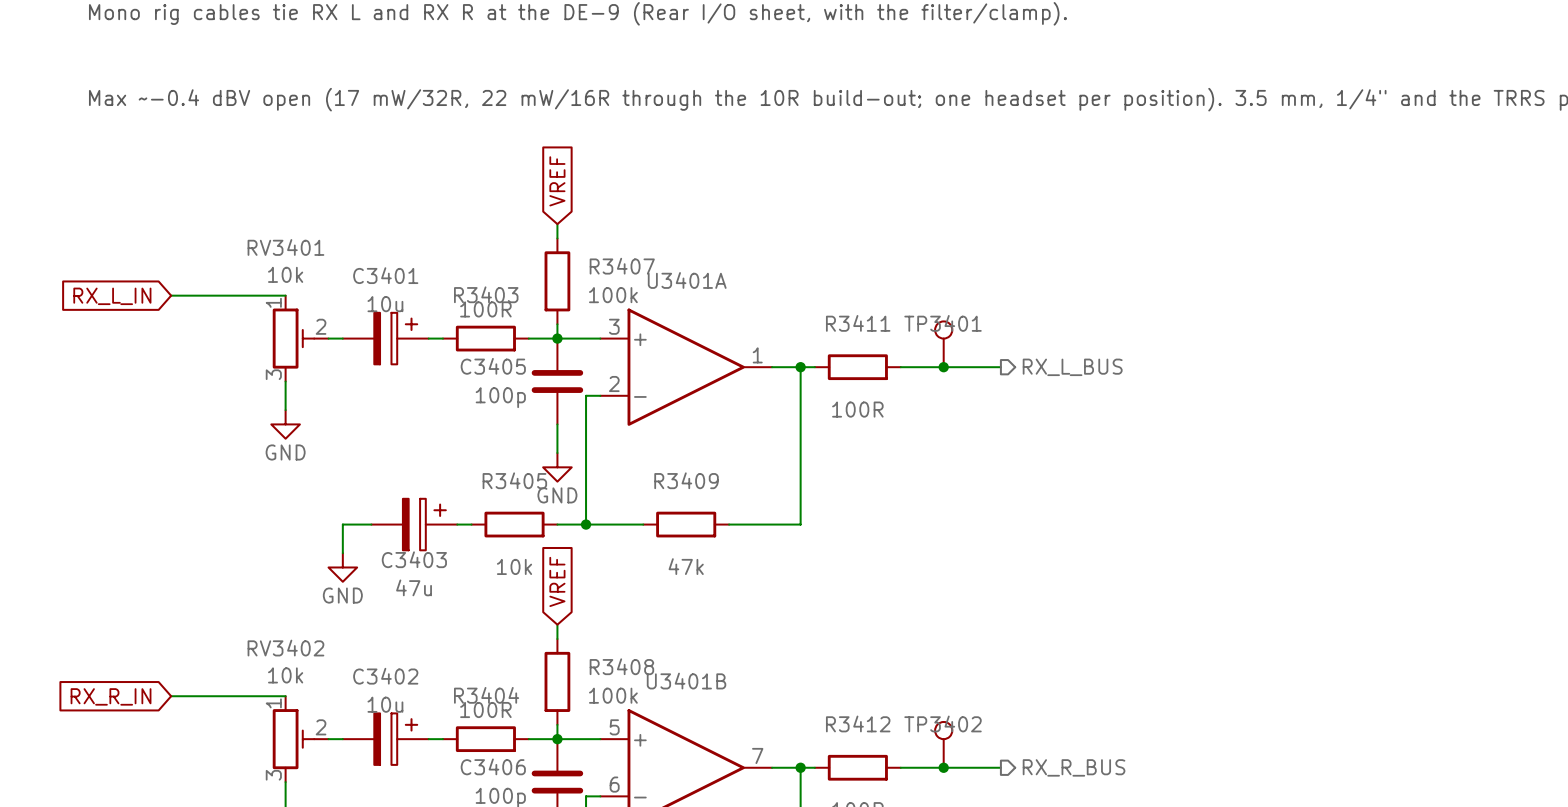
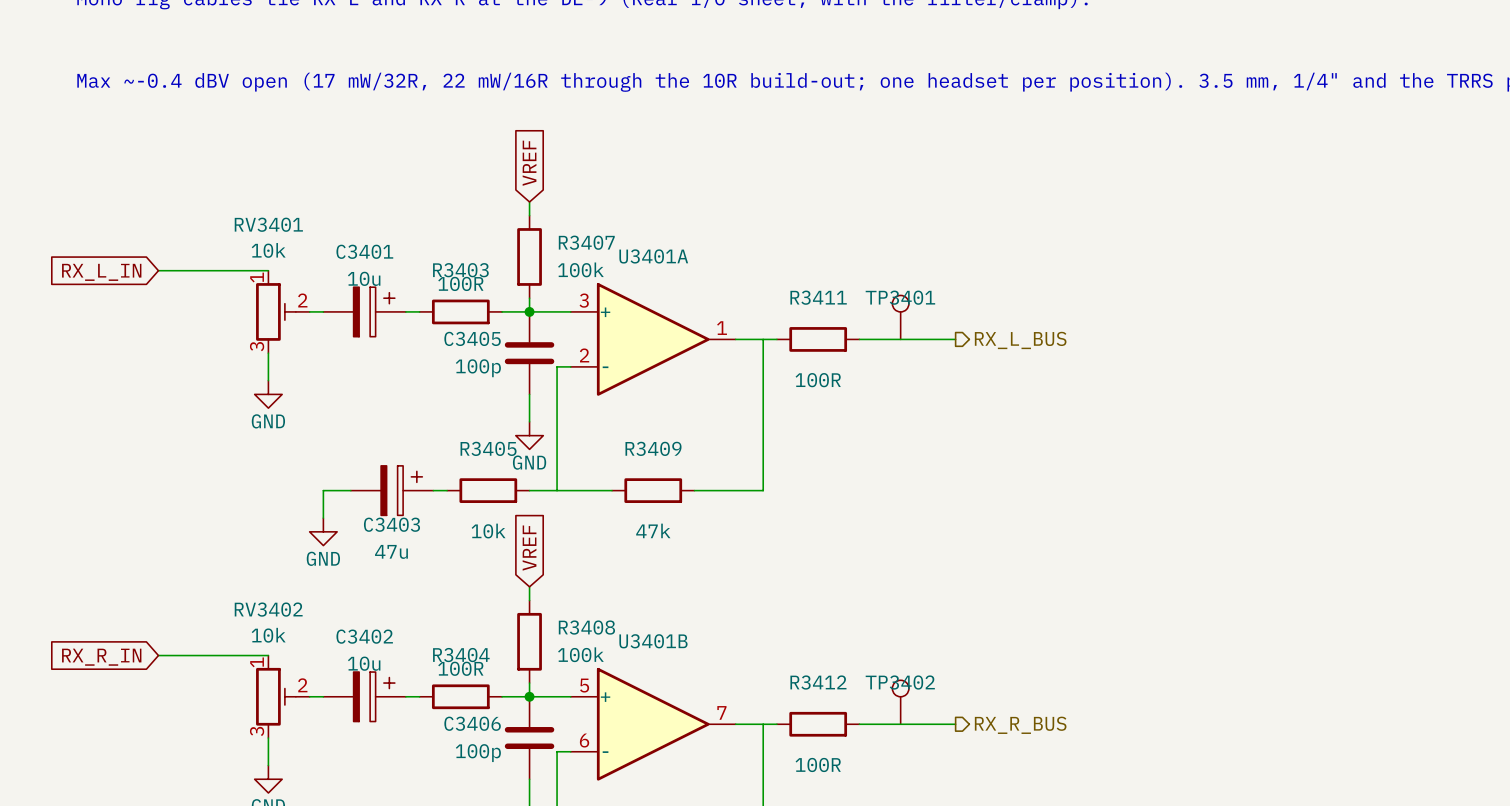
junction: (800, 367) -> none
junction: (943, 367) -> none
junction: (586, 524) -> none
junction: (800, 767) -> none
junction: (943, 767) -> none

